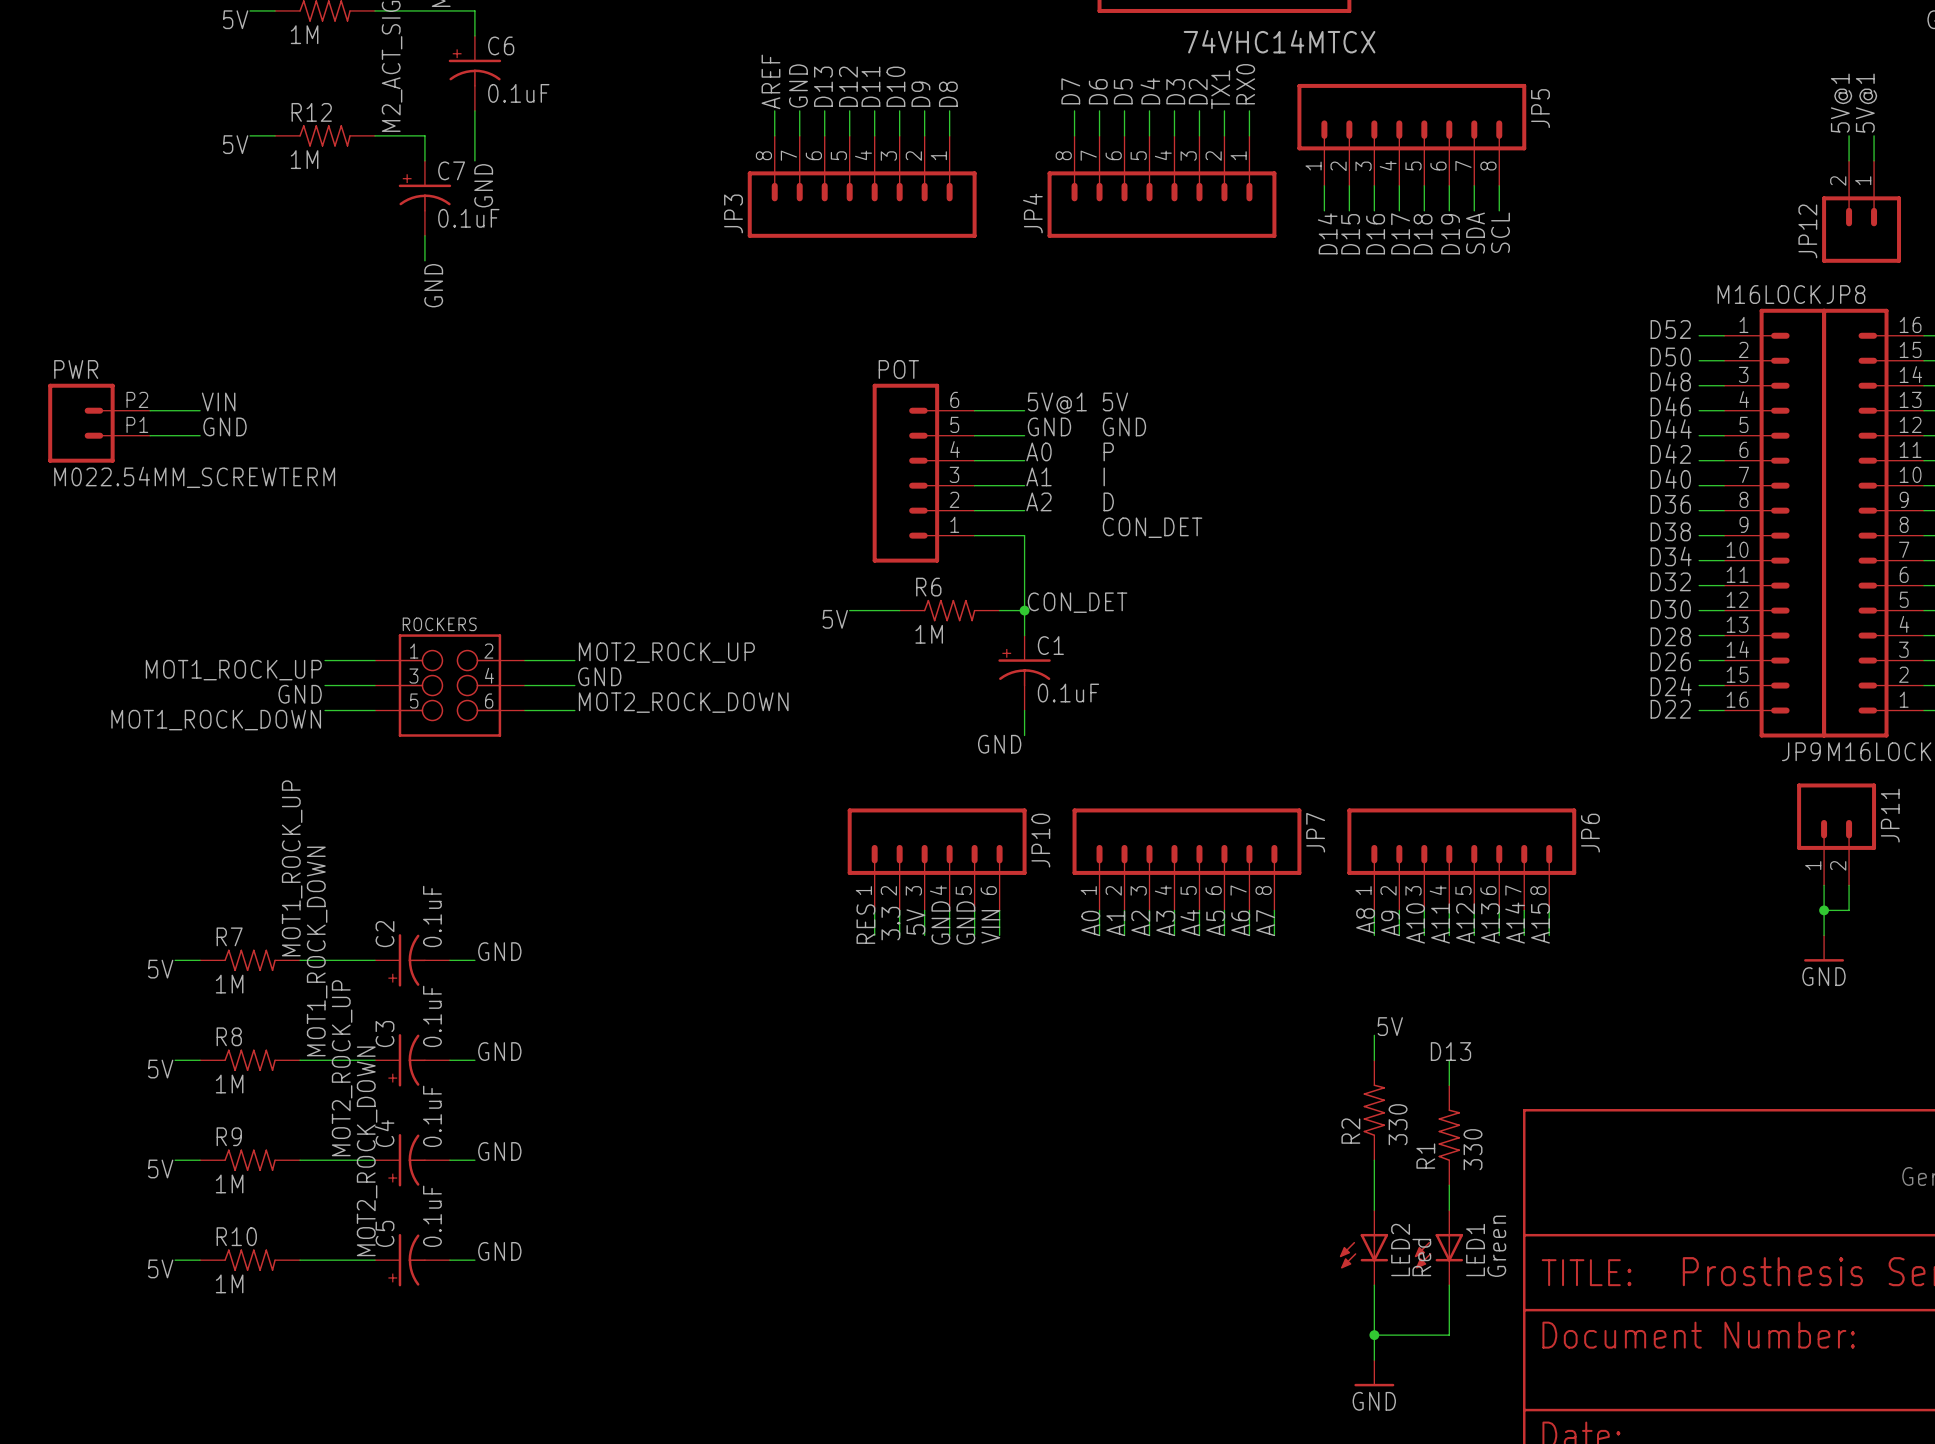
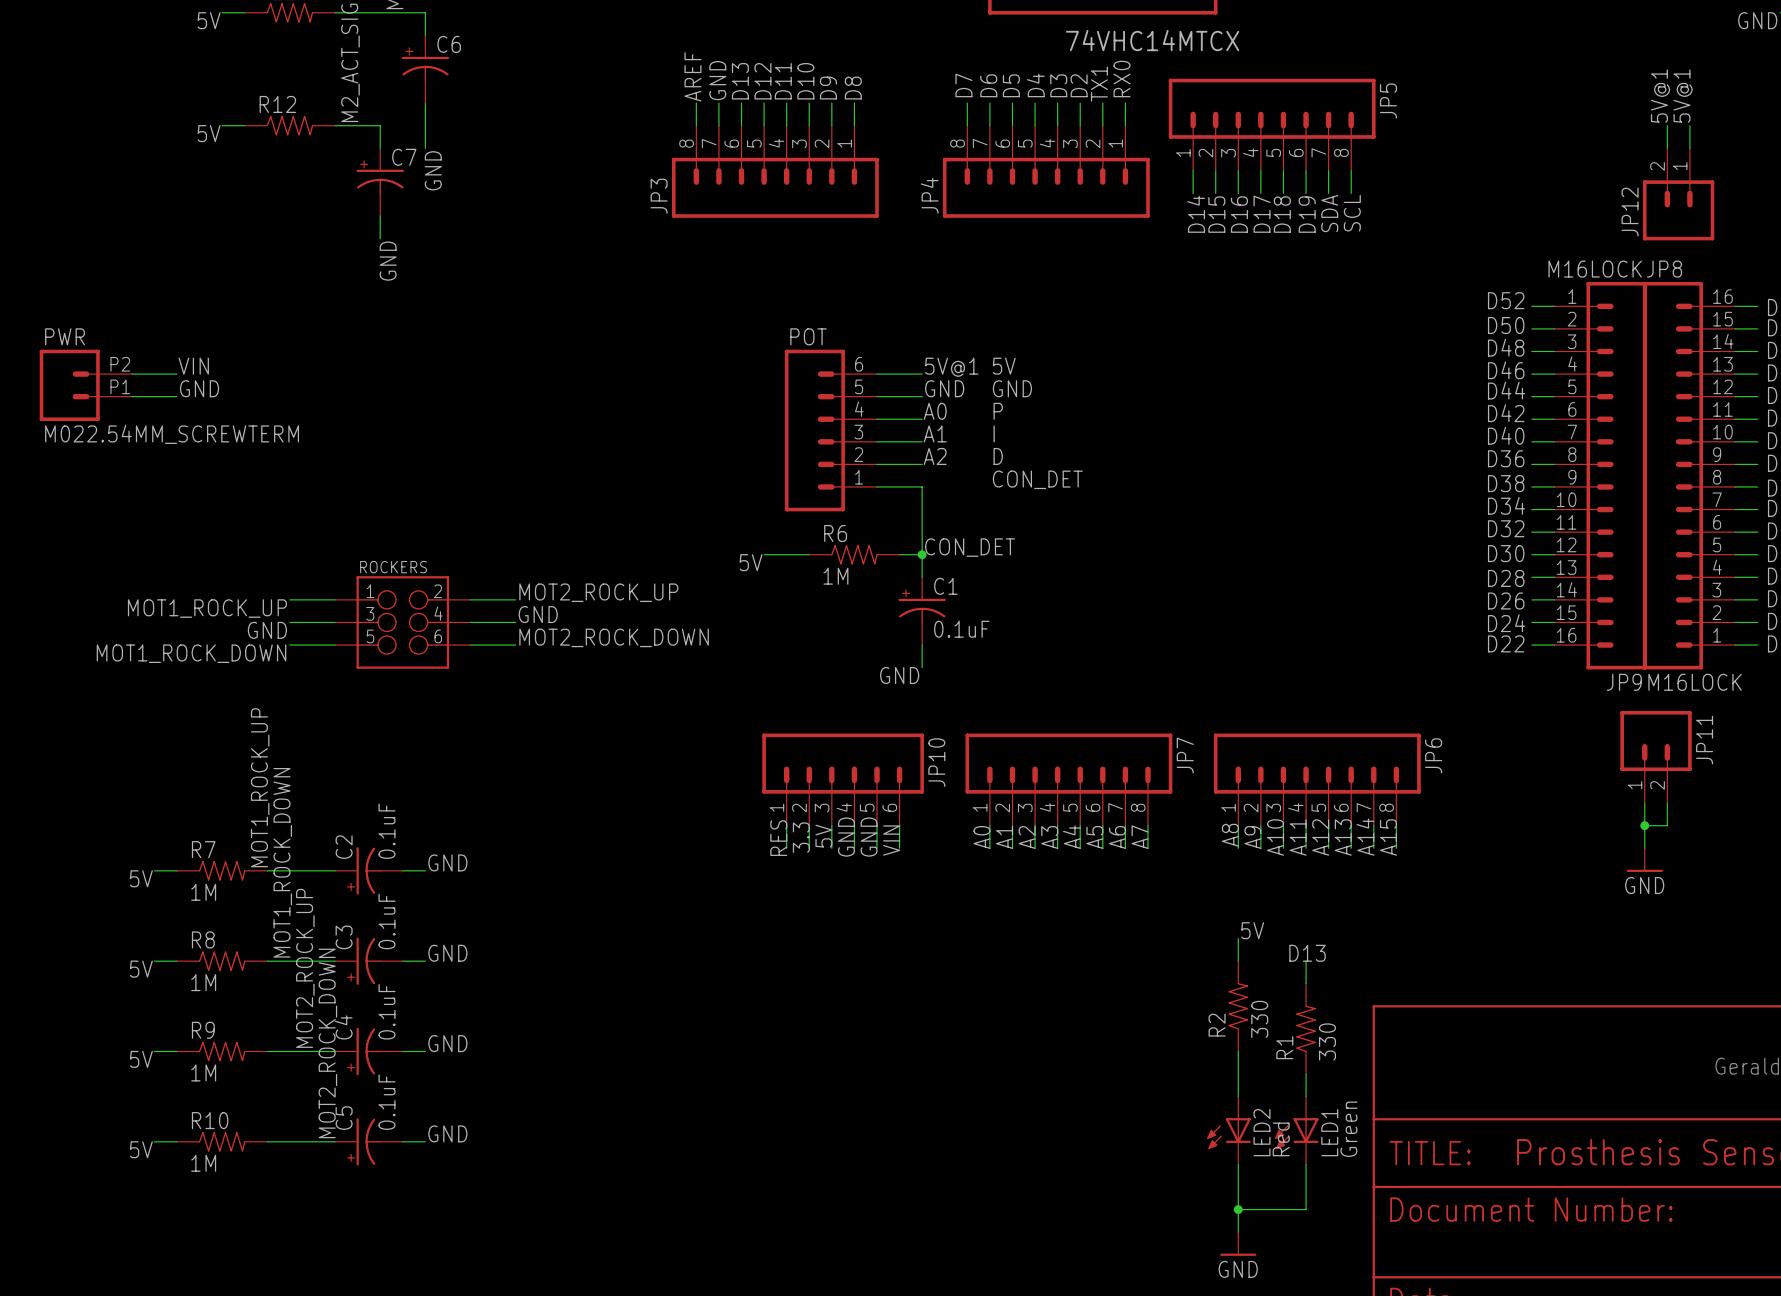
part value: 1M (304, 34) -> none
C6 value: 0.1uF (518, 93) -> none
R12 value: 1M (304, 159) -> none
C7 value: 0.1uF (468, 218) -> none

